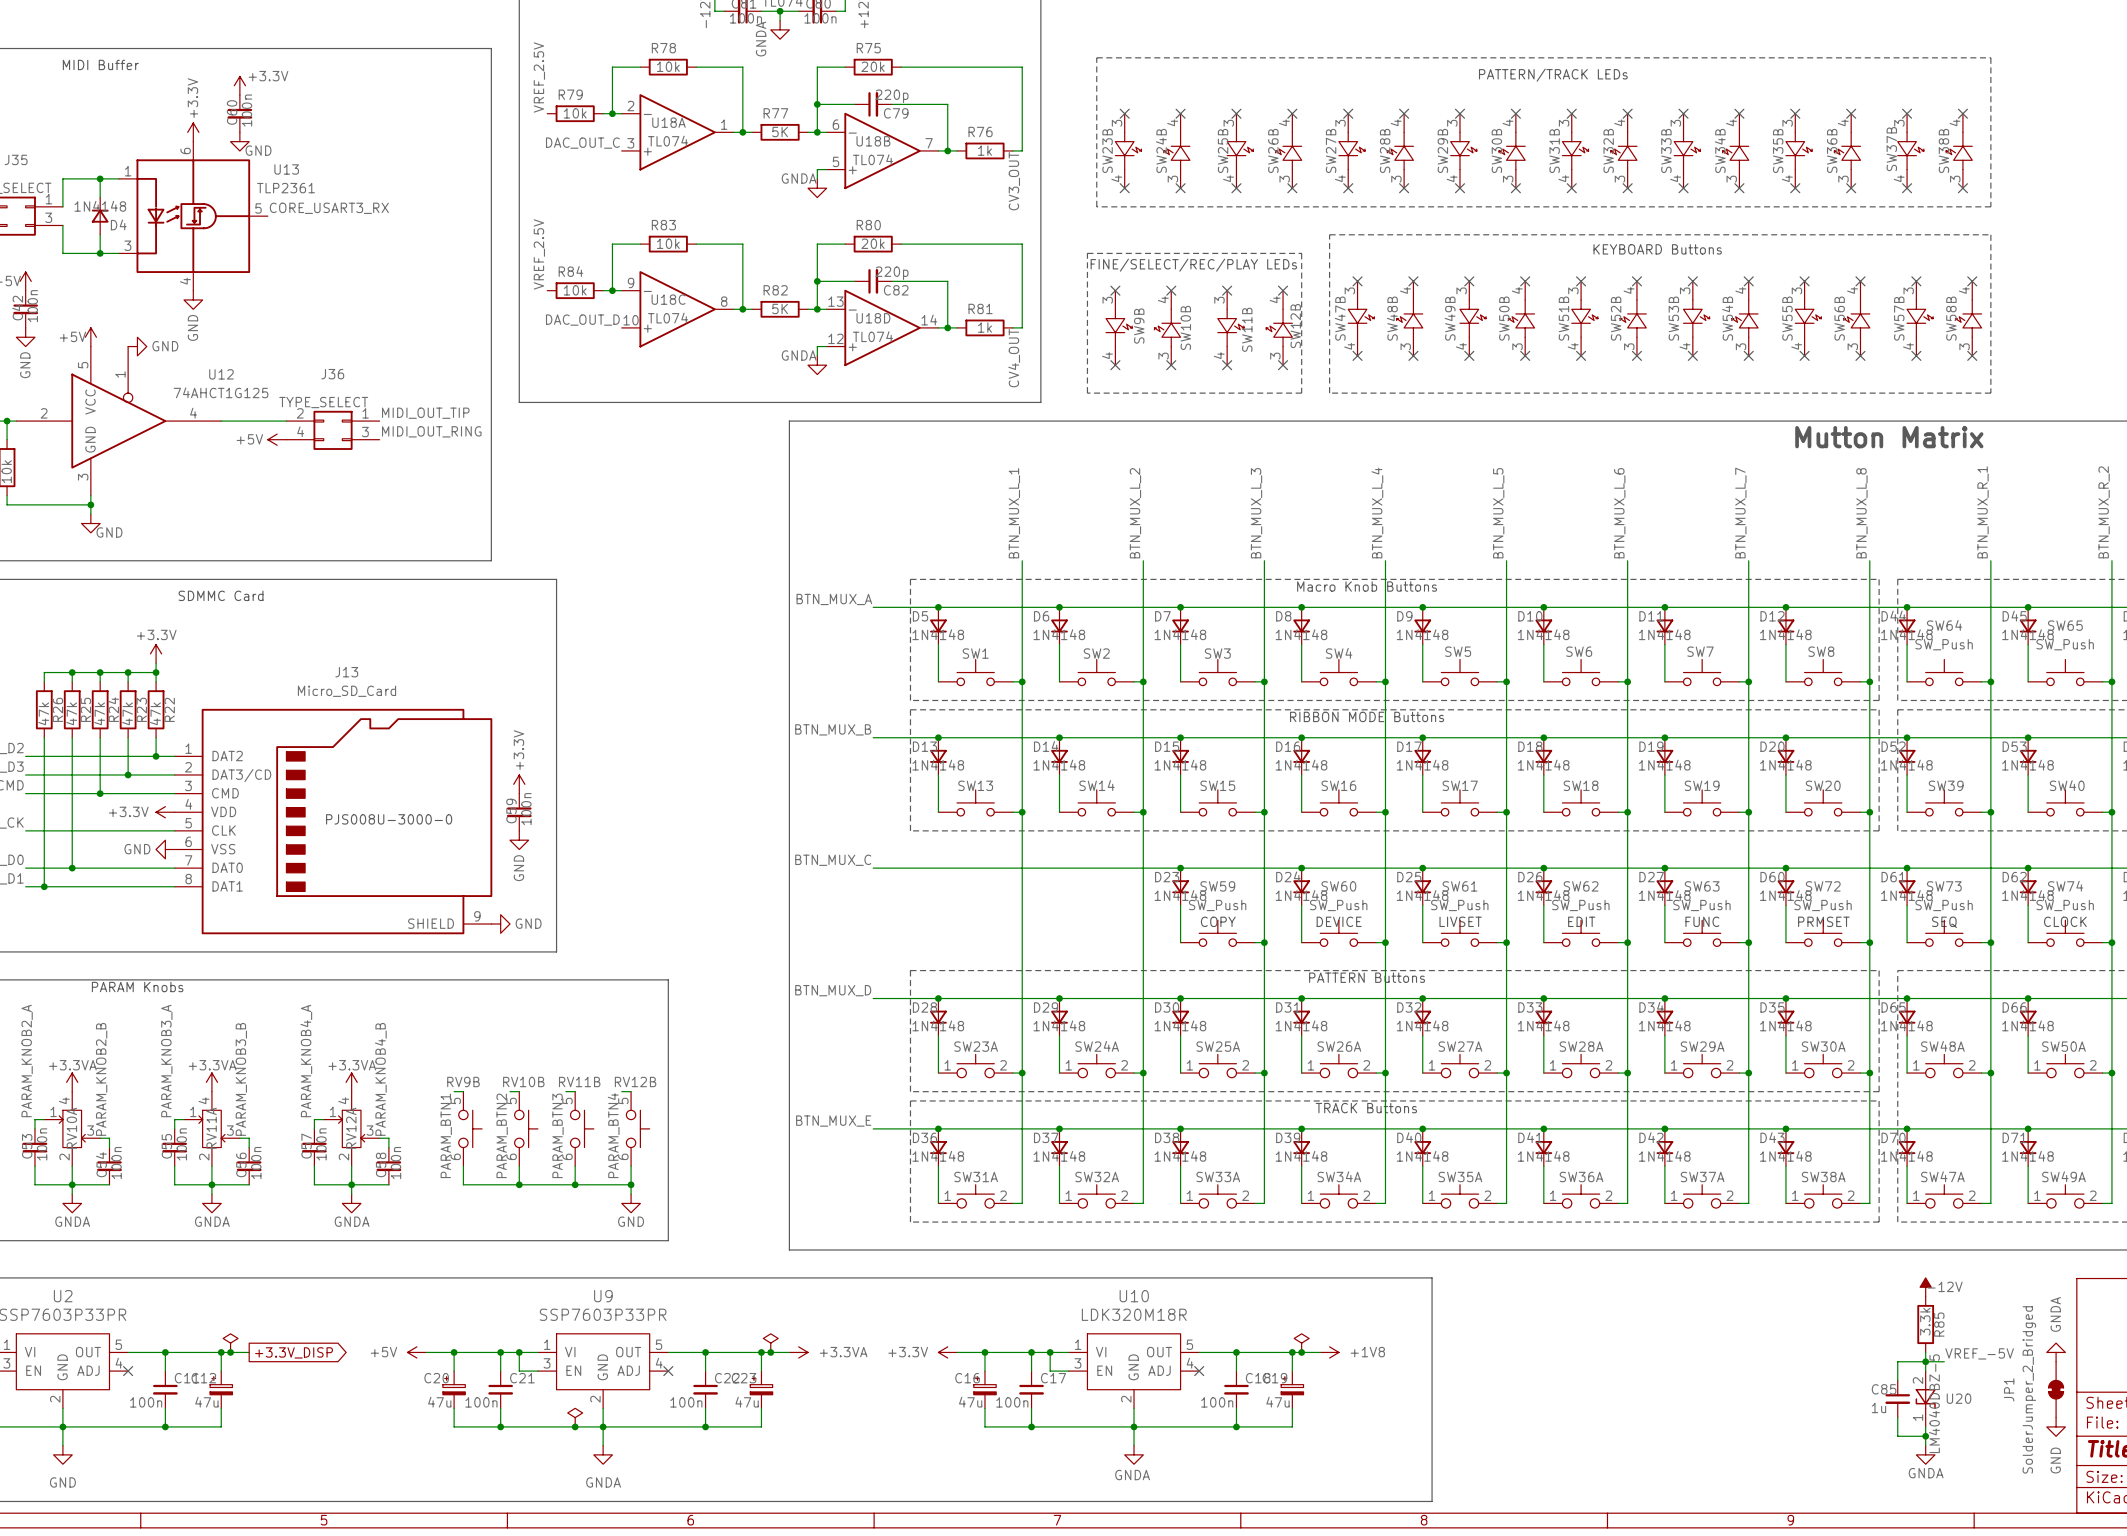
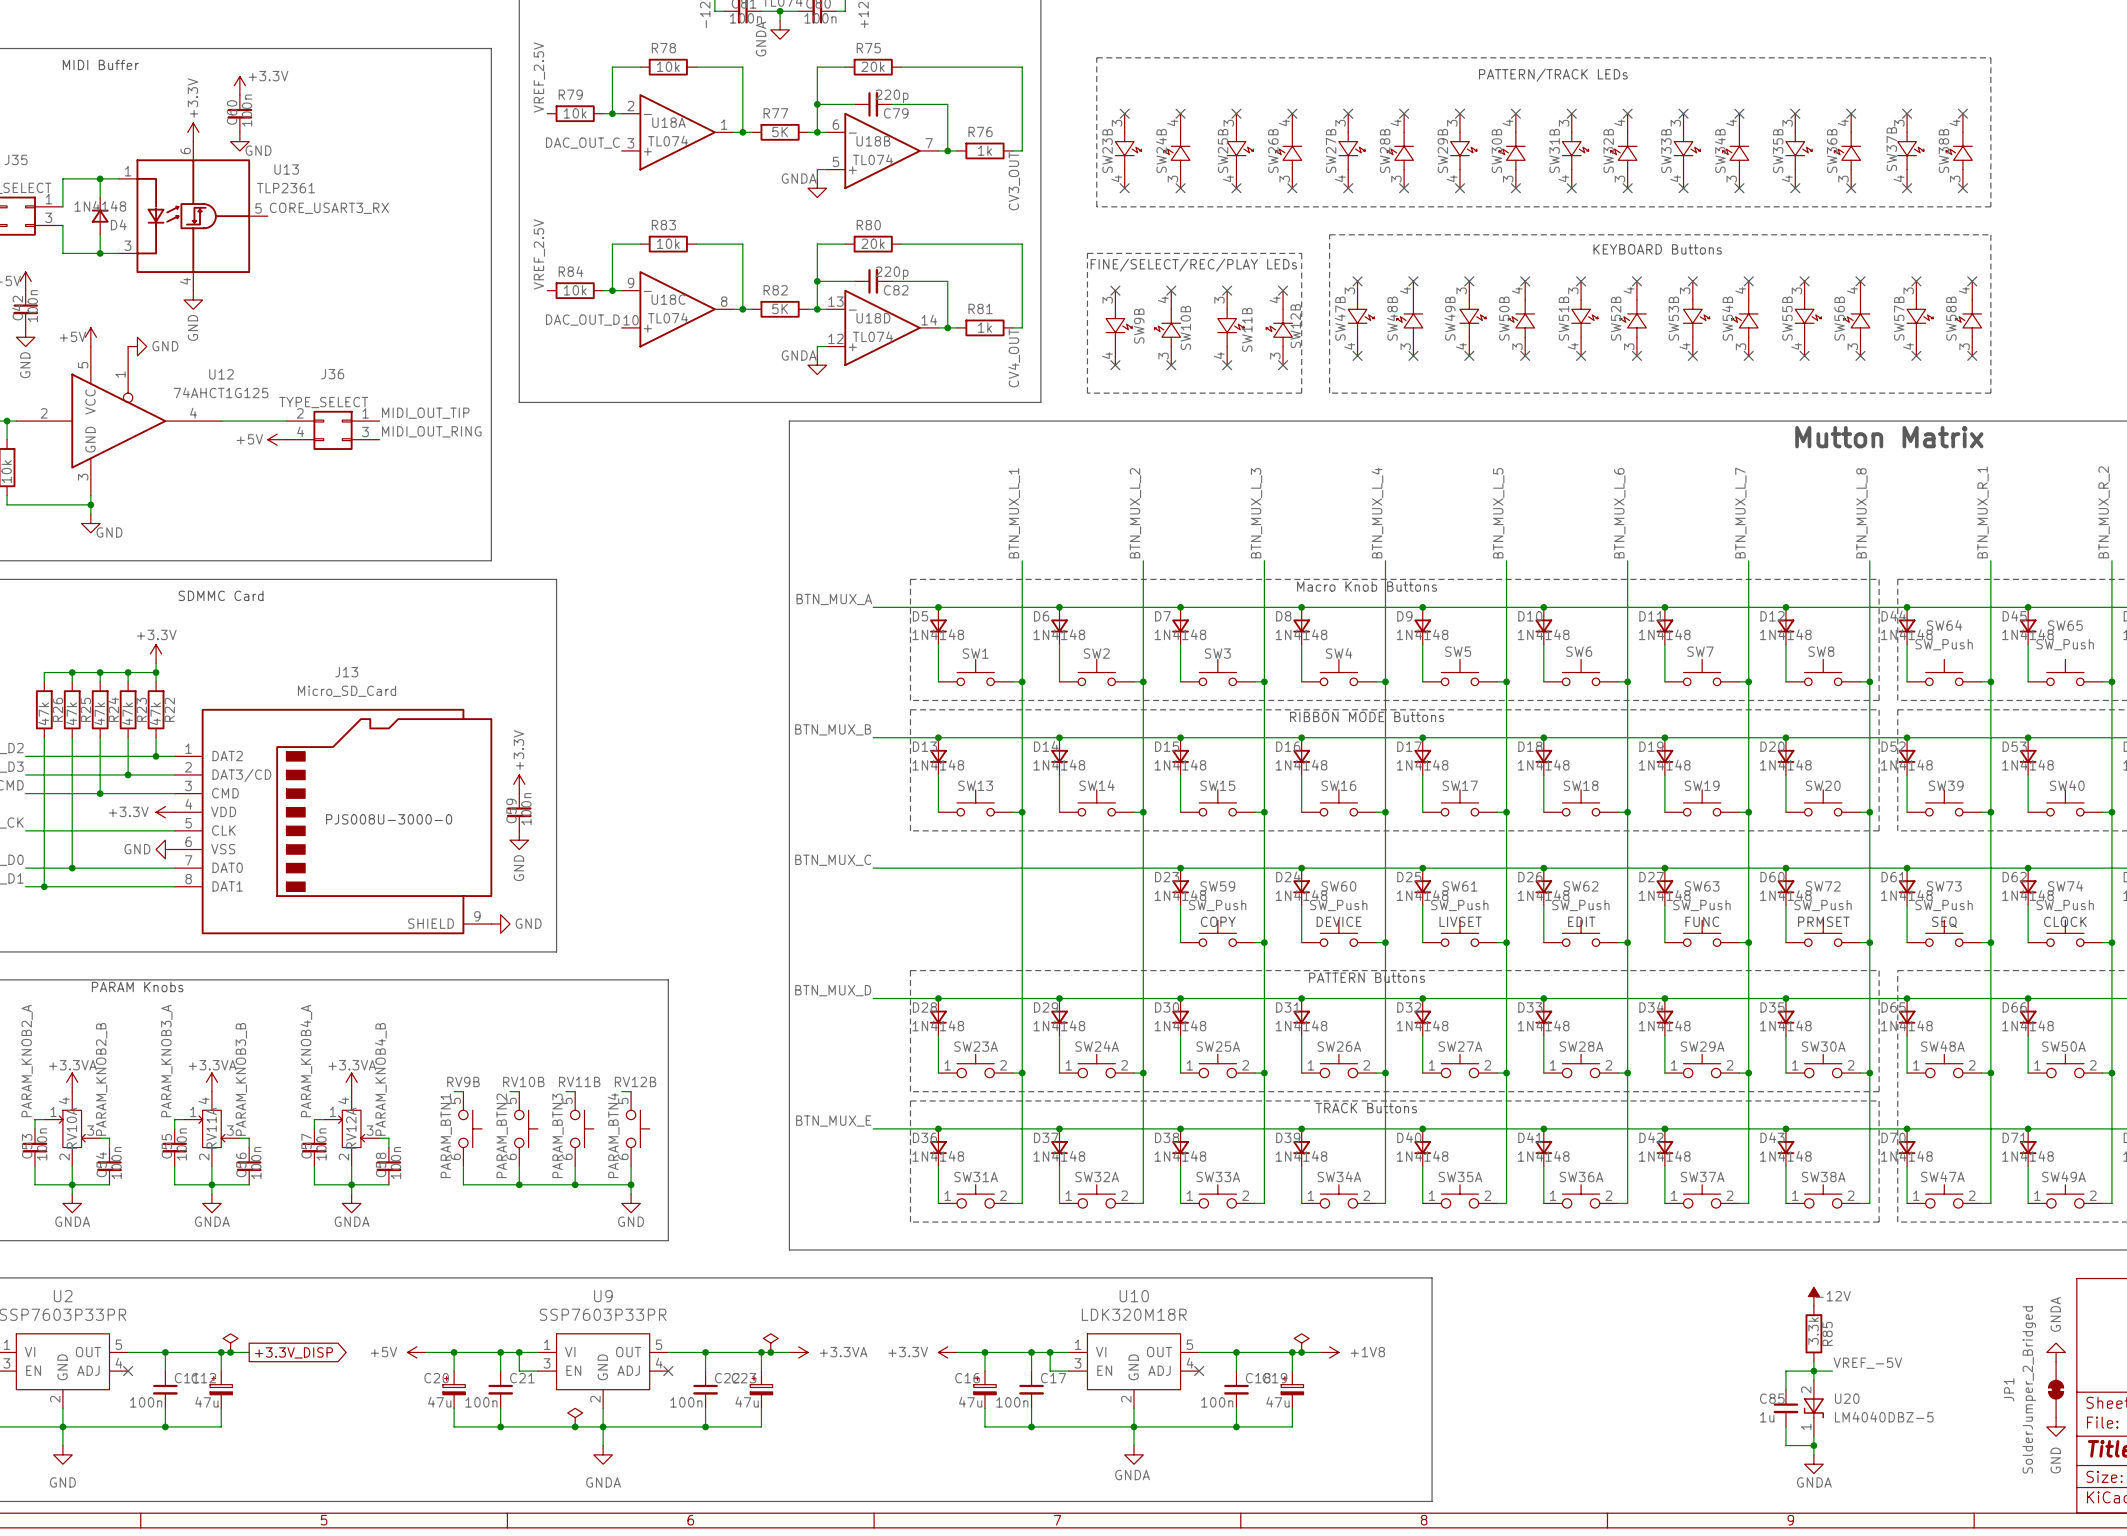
power symbol position: -12V (1925, 1287) -> -12V (1813, 1296)
R85 position: (1925, 1324) -> (1813, 1333)
wire: (1925, 1352) (1925, 1371) -> (1813, 1361) (1813, 1380)
label position: VREF_-5V (1979, 1353) -> VREF_-5V (1867, 1363)
junction: (1925, 1361) -> none
wire: (1944, 1361) (1897, 1361) (1897, 1380) -> (1832, 1371) (1785, 1371) (1785, 1389)
junction: none -> (1813, 1371)
U20 name position: U20 (1959, 1398) -> U20 (1847, 1398)
C85 position: (1897, 1399) -> (1785, 1408)
U20 position: (1925, 1399) -> (1813, 1408)
U20 value rotation: 0° (1934, 1403) -> 90° clockwise (1884, 1417)
wire: (1897, 1417) (1897, 1436) (1925, 1436) -> (1785, 1426) (1785, 1445) (1813, 1445)
wire: (1925, 1426) (1925, 1445) -> (1813, 1436) (1813, 1454)
junction: (1925, 1436) -> none
junction: none -> (1813, 1445)
power symbol position: GNDA (1925, 1454) -> GNDA (1813, 1464)

